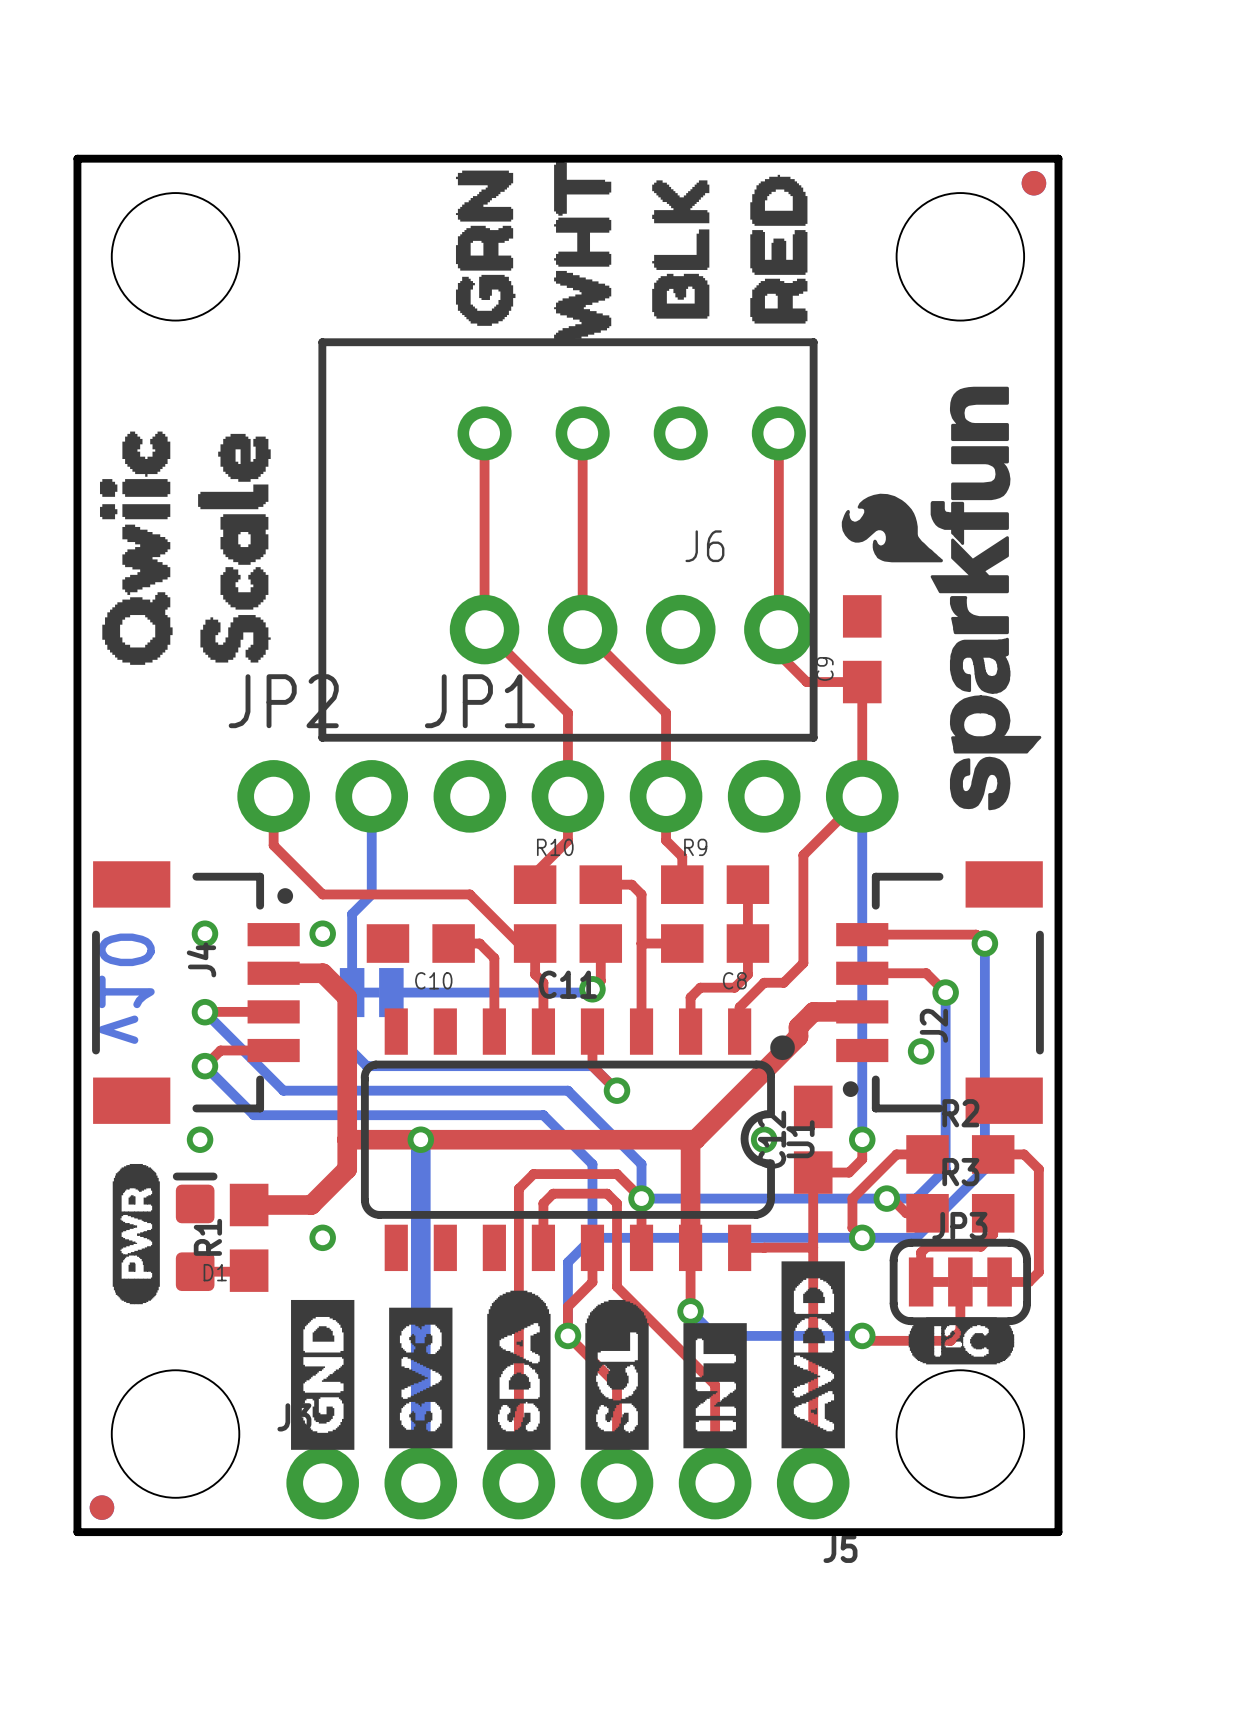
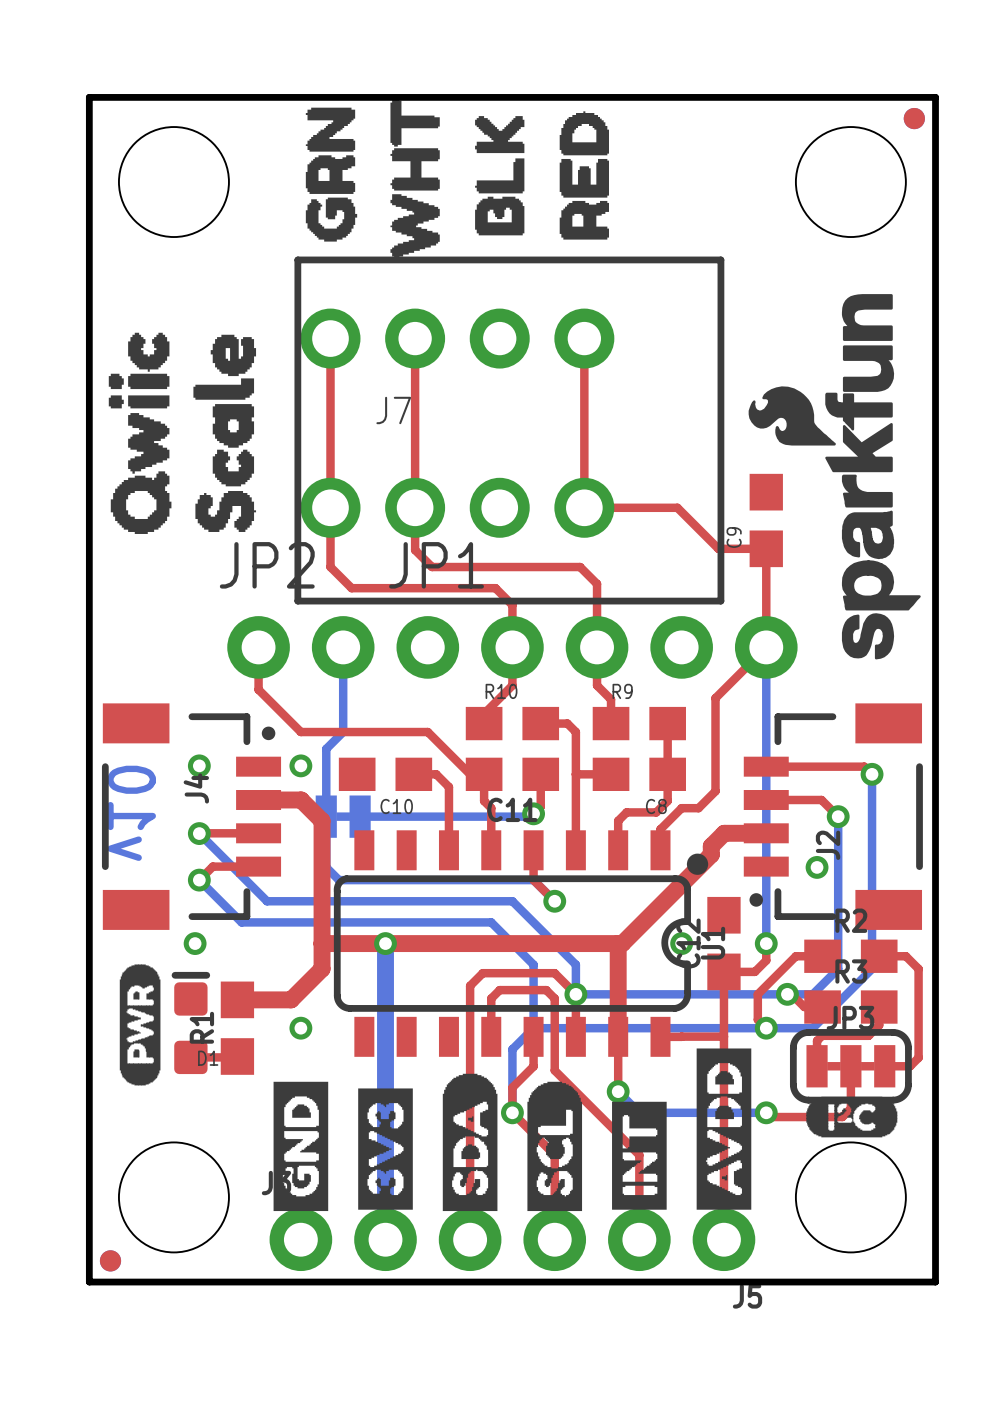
drawing position: (485, 248) -> (331, 174)
drawing position: (680, 249) -> (499, 175)
drawing position: (778, 249) -> (584, 175)
drawing position: (582, 252) -> (415, 178)
top track: (484, 433) (484, 629) (567, 712) (567, 747) -> (330, 338) (330, 567) (351, 588) (495, 588) (512, 605)
top track: (582, 433) (582, 629) (666, 712) (666, 722) -> (415, 338) (415, 550) (432, 567) (580, 567) (597, 583)
top track: (778, 433) (778, 654) -> (584, 338) (584, 507) (677, 507) (694, 524)
J6: (567, 539) -> none
J7: none -> (509, 430)

